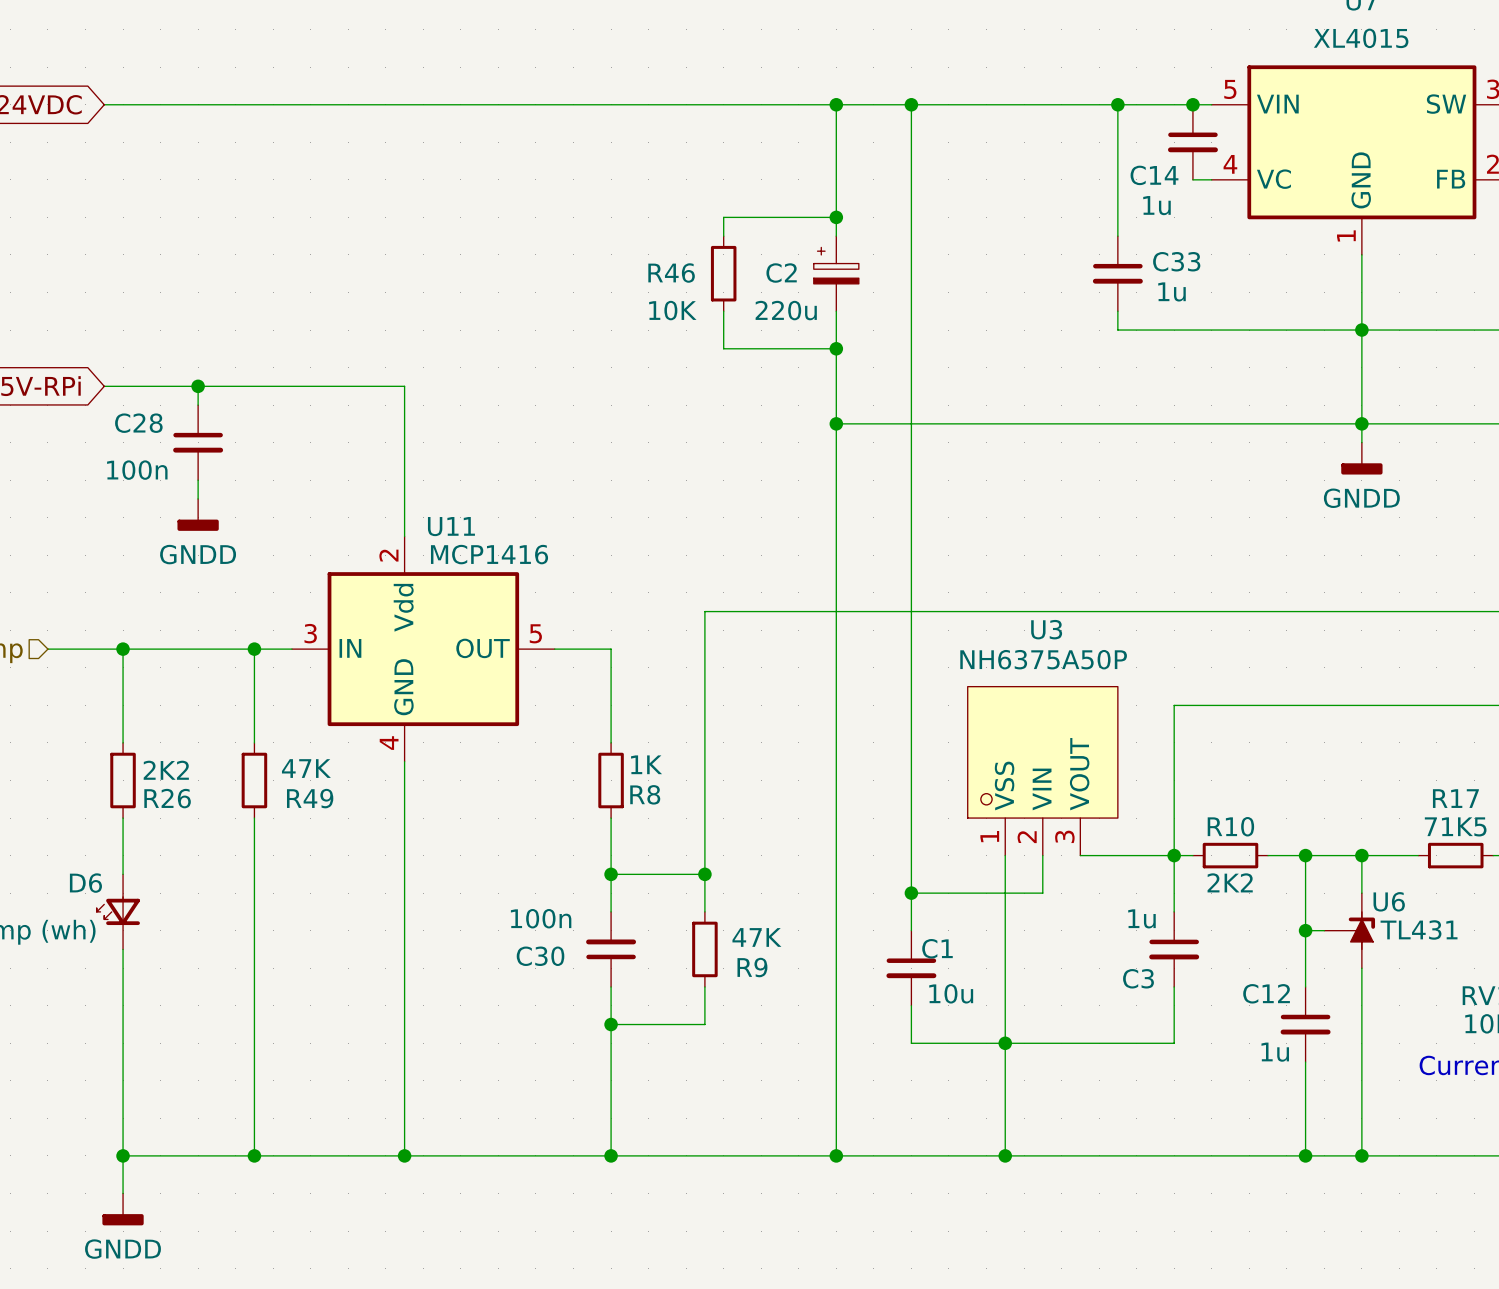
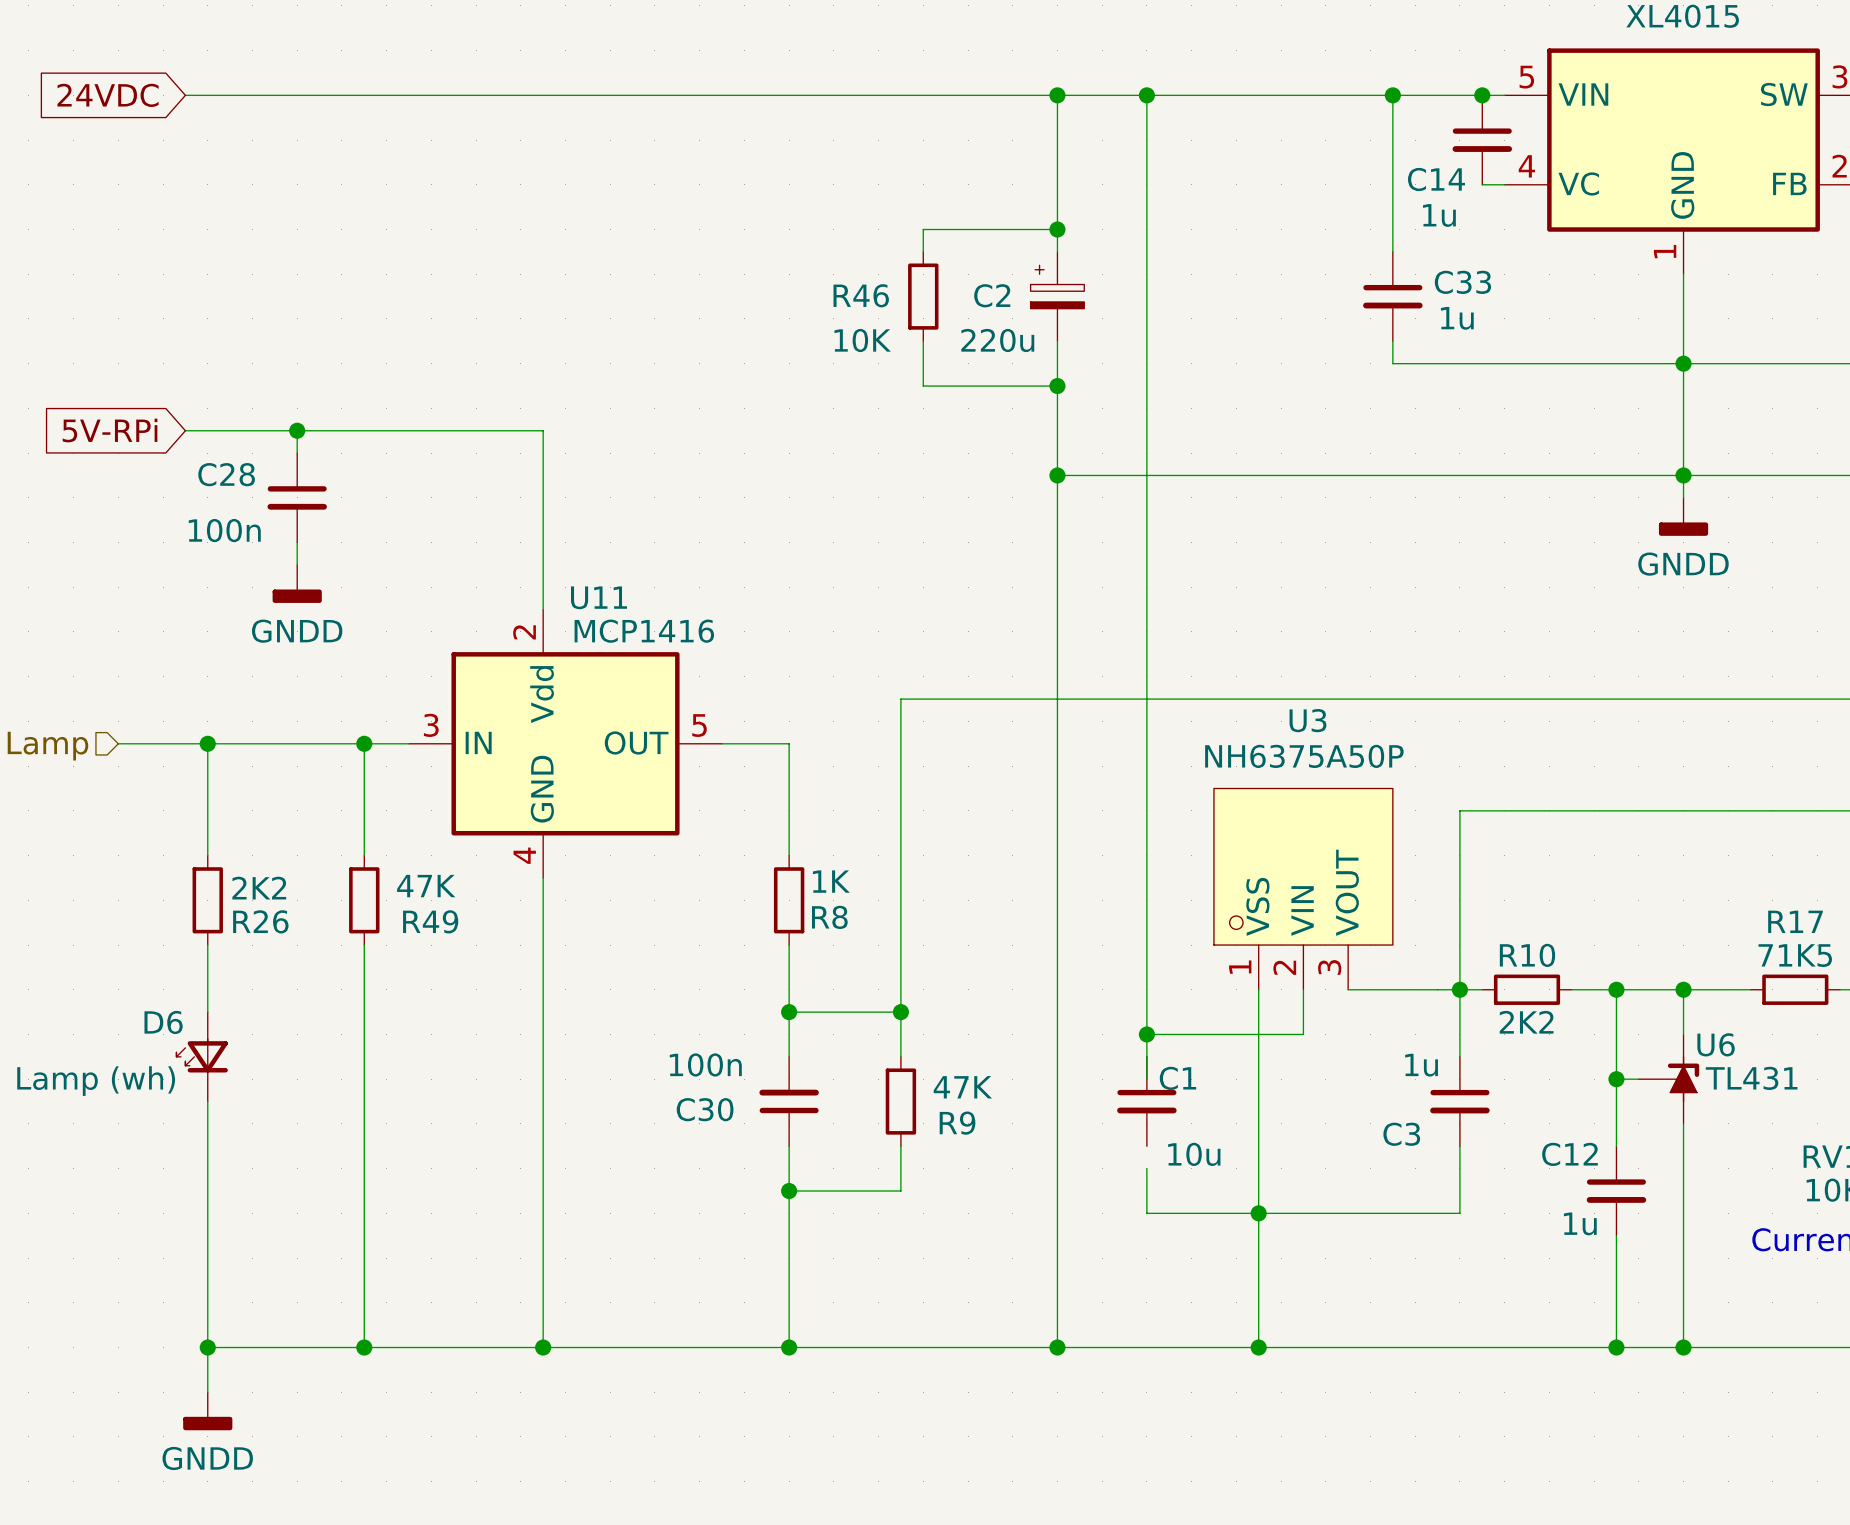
C1 position: (911, 968) -> (1146, 1101)
C3 name position: C3 (1138, 978) -> C3 (1401, 1134)

